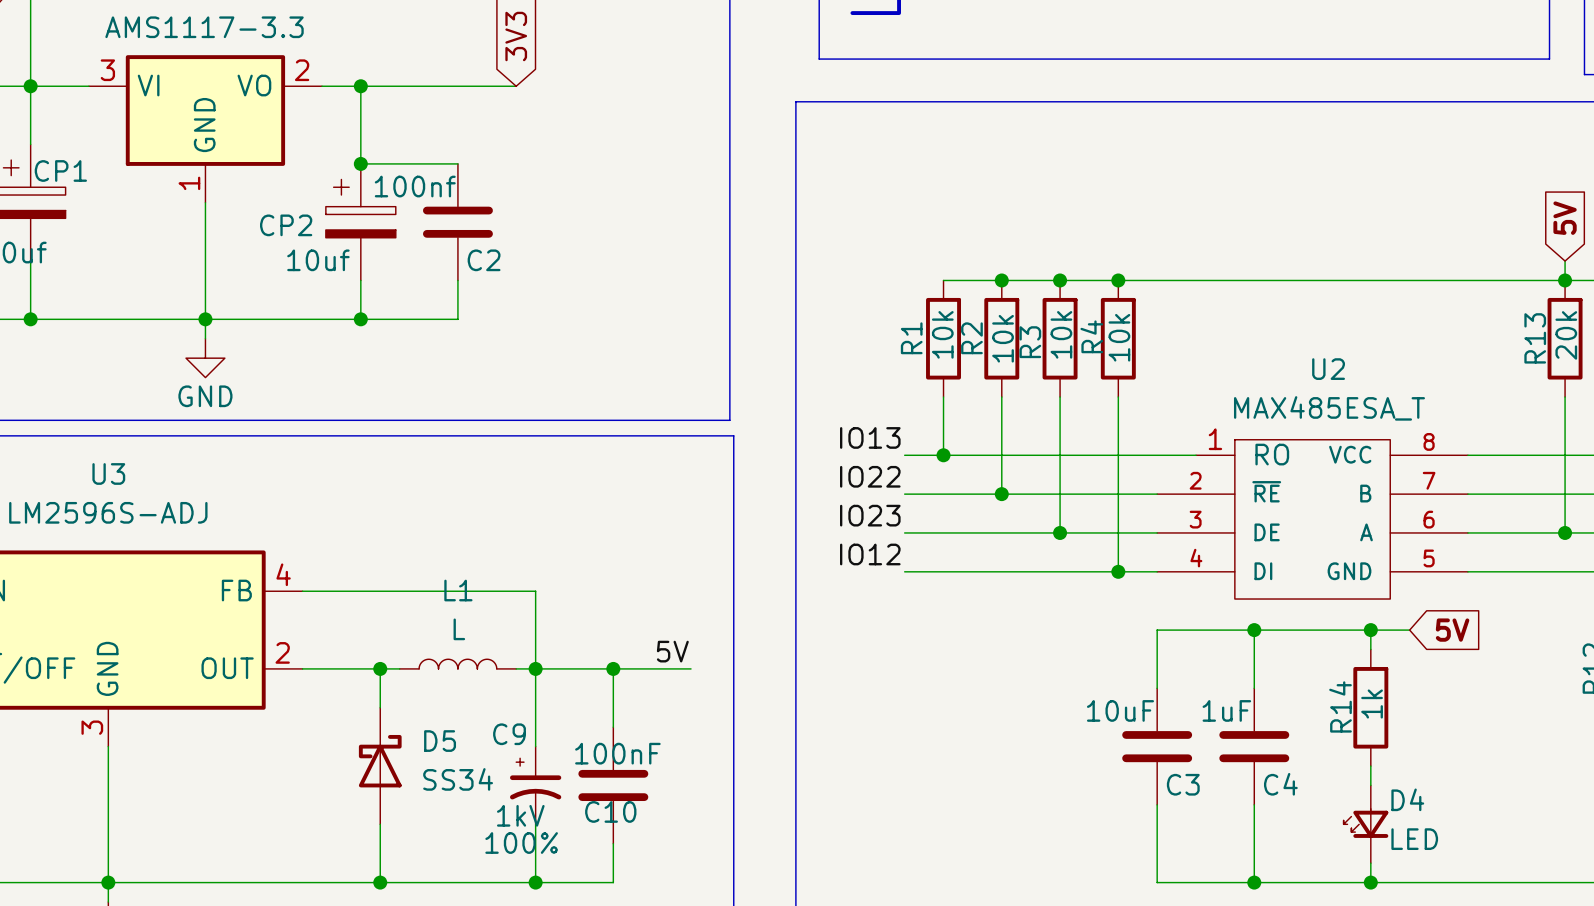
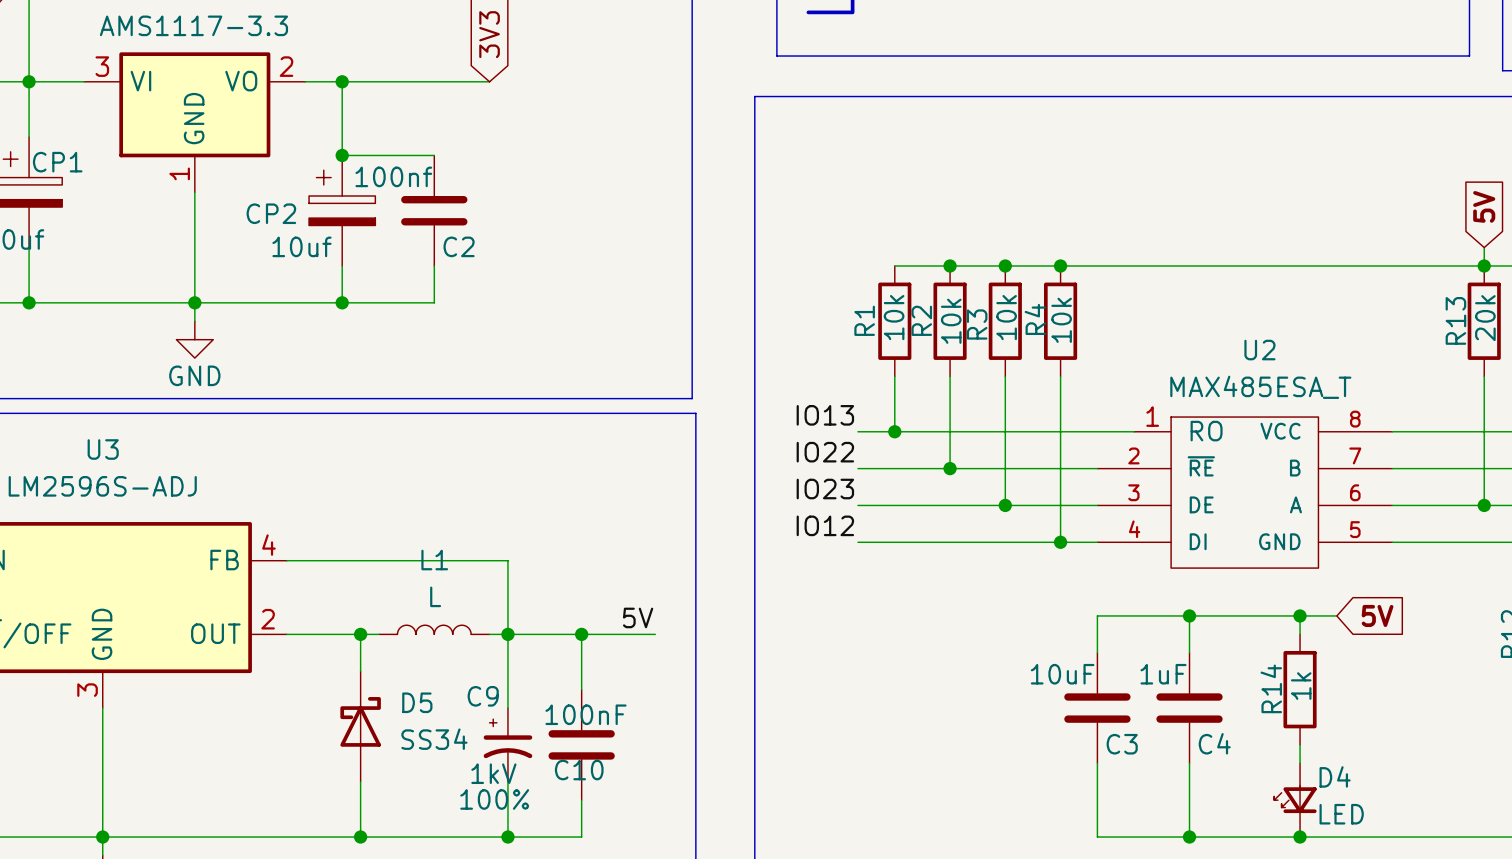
wire: (1254, 630) (1254, 649) -> none
junction position: (1254, 630) -> (1189, 615)
junction position: (1370, 630) -> (1300, 615)
wire: (1409, 630) (1157, 630) (1157, 649) -> (1336, 615) (1097, 615)
global label position: 5V (1452, 630) -> 5V (1377, 615)
R14 position: (1370, 707) -> (1300, 689)
D4 position: (1365, 824) -> (1295, 800)

